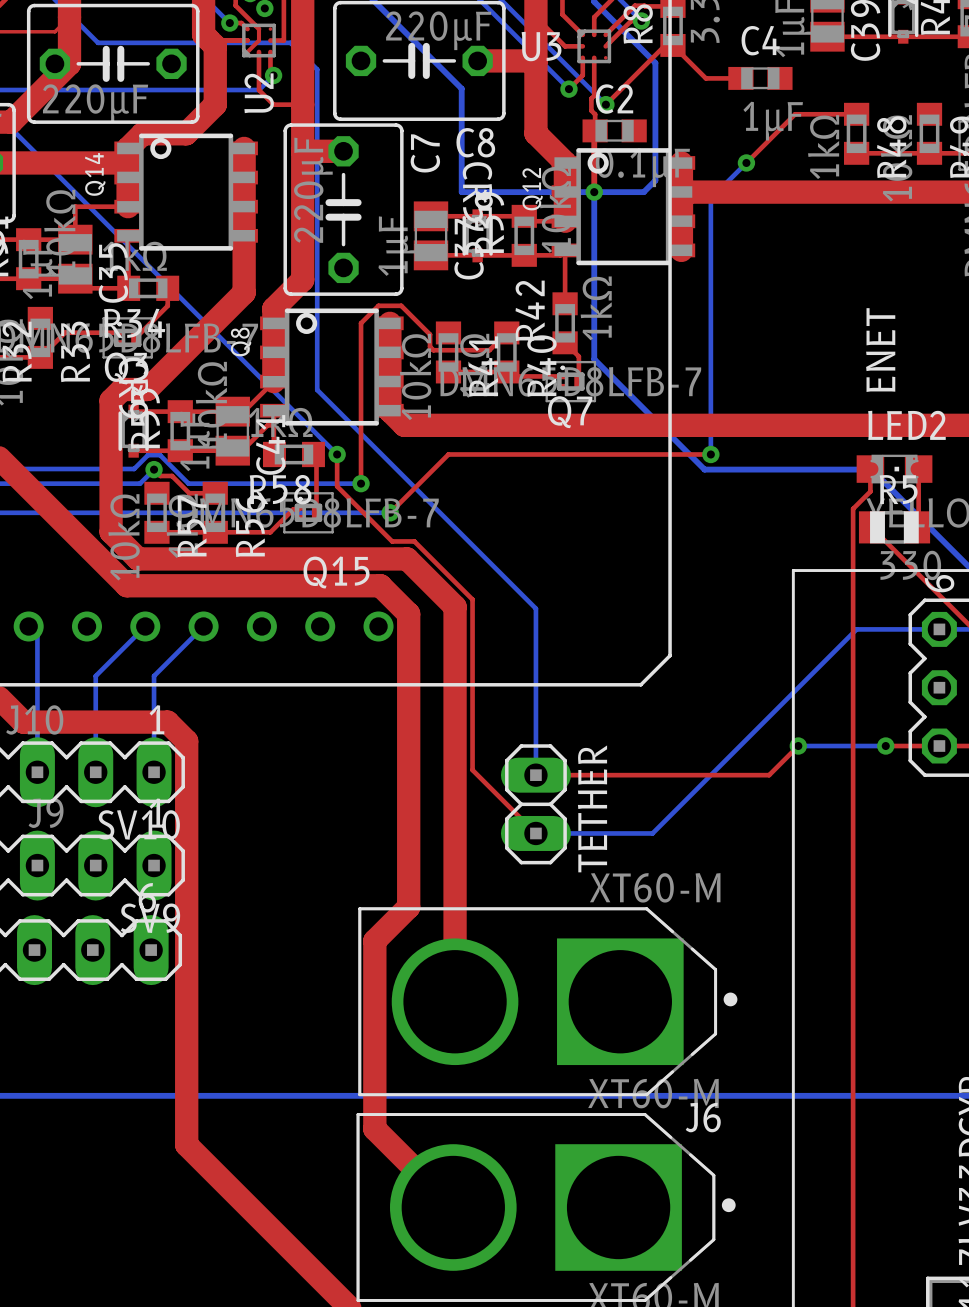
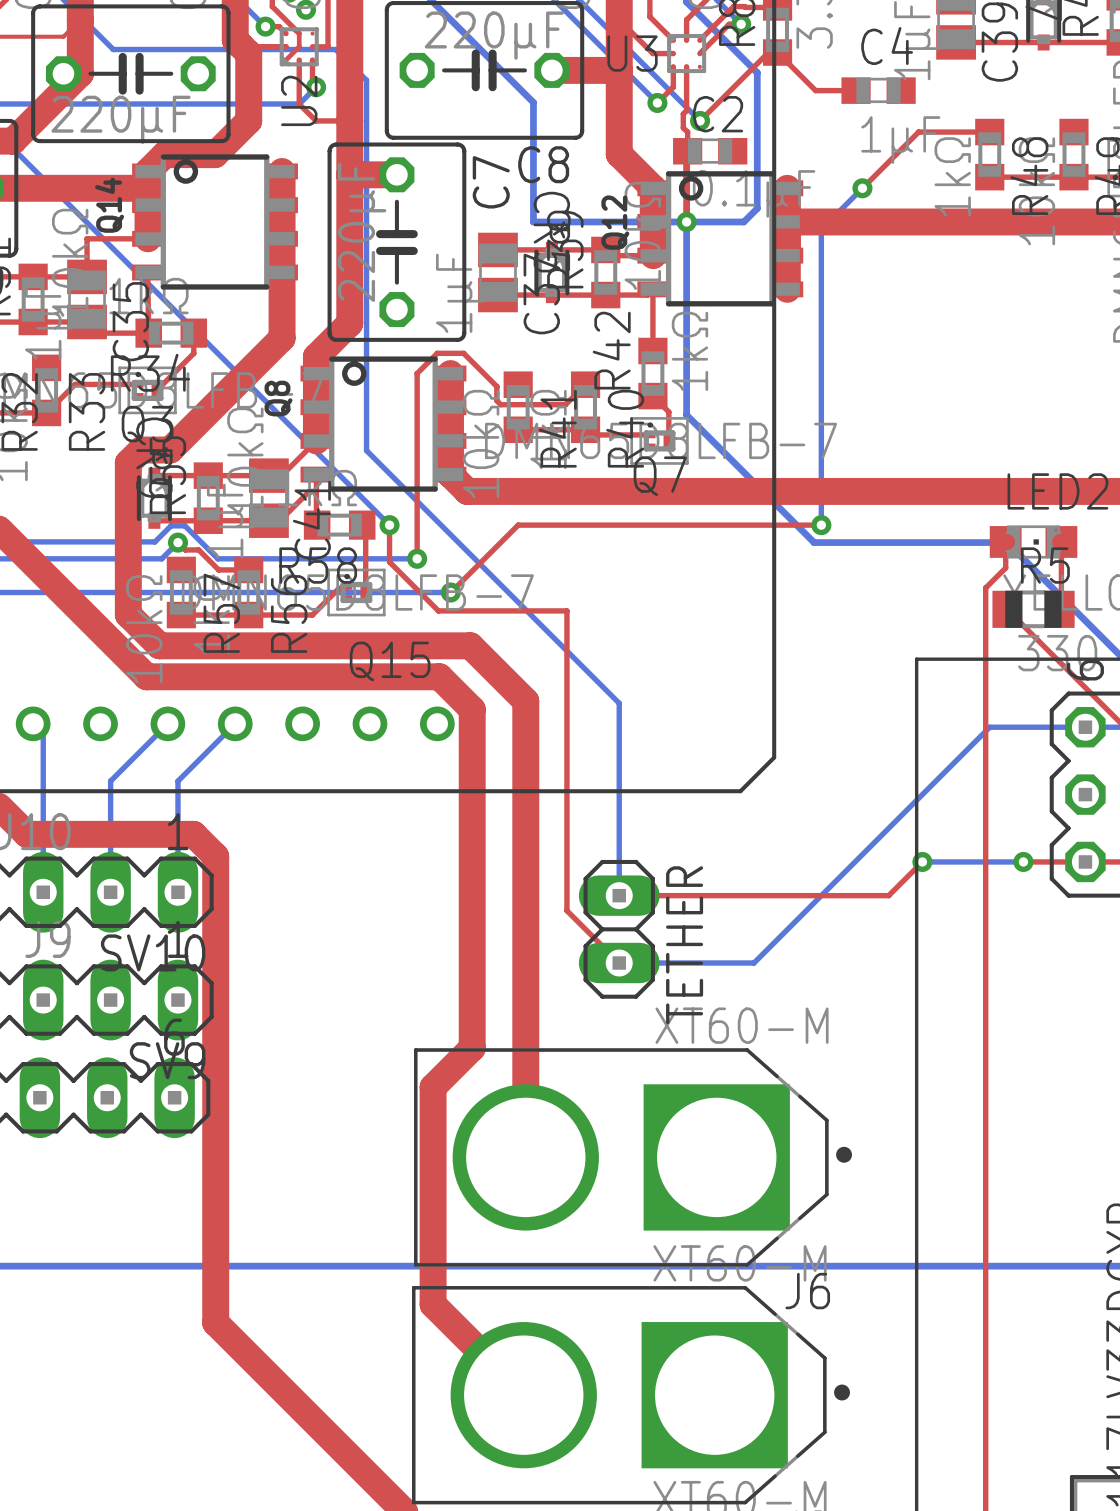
text: ENET (880, 350) -> none
top track: (379, 528) (392, 541) (414, 541) (472, 599) (472, 770) (490, 788) -> (438, 610) (566, 610) (566, 910)

